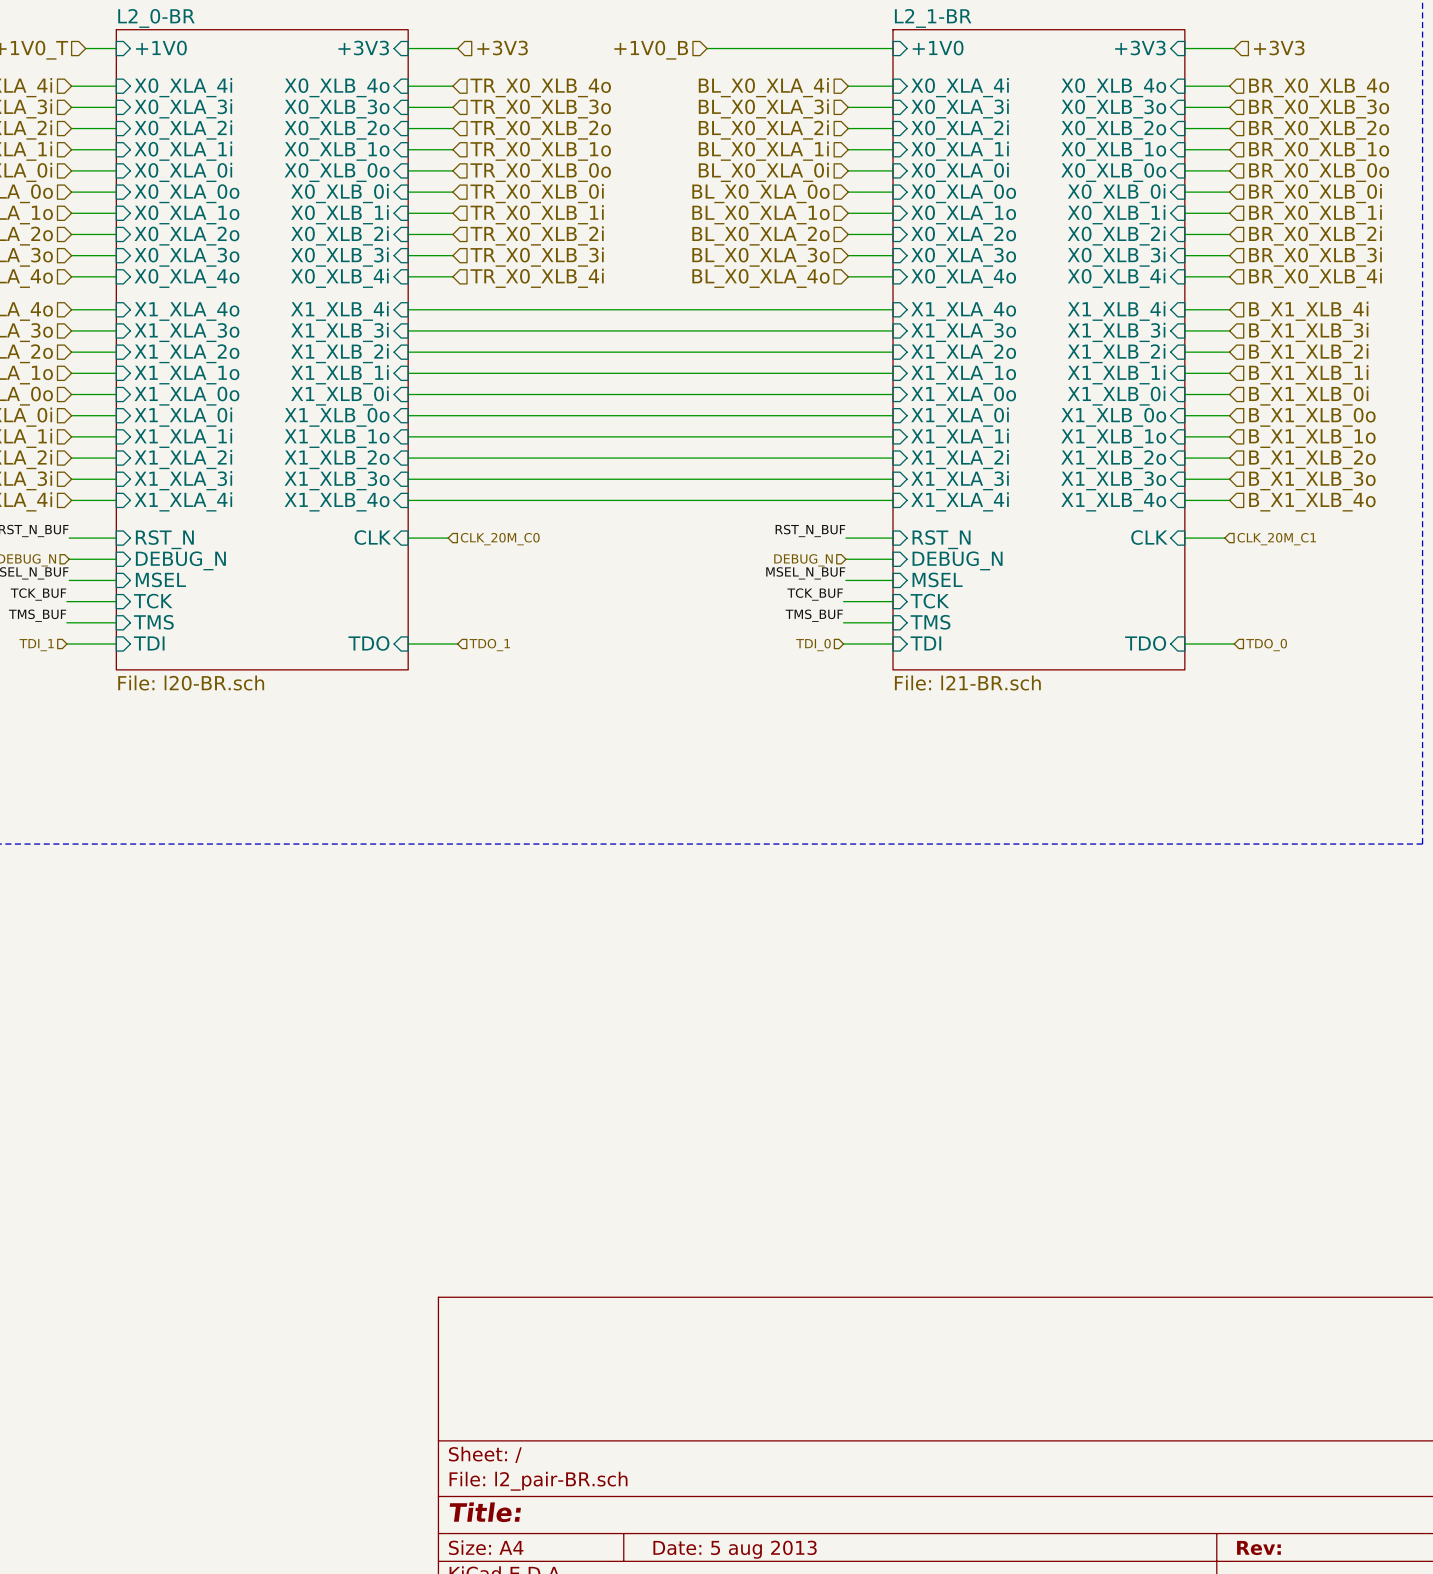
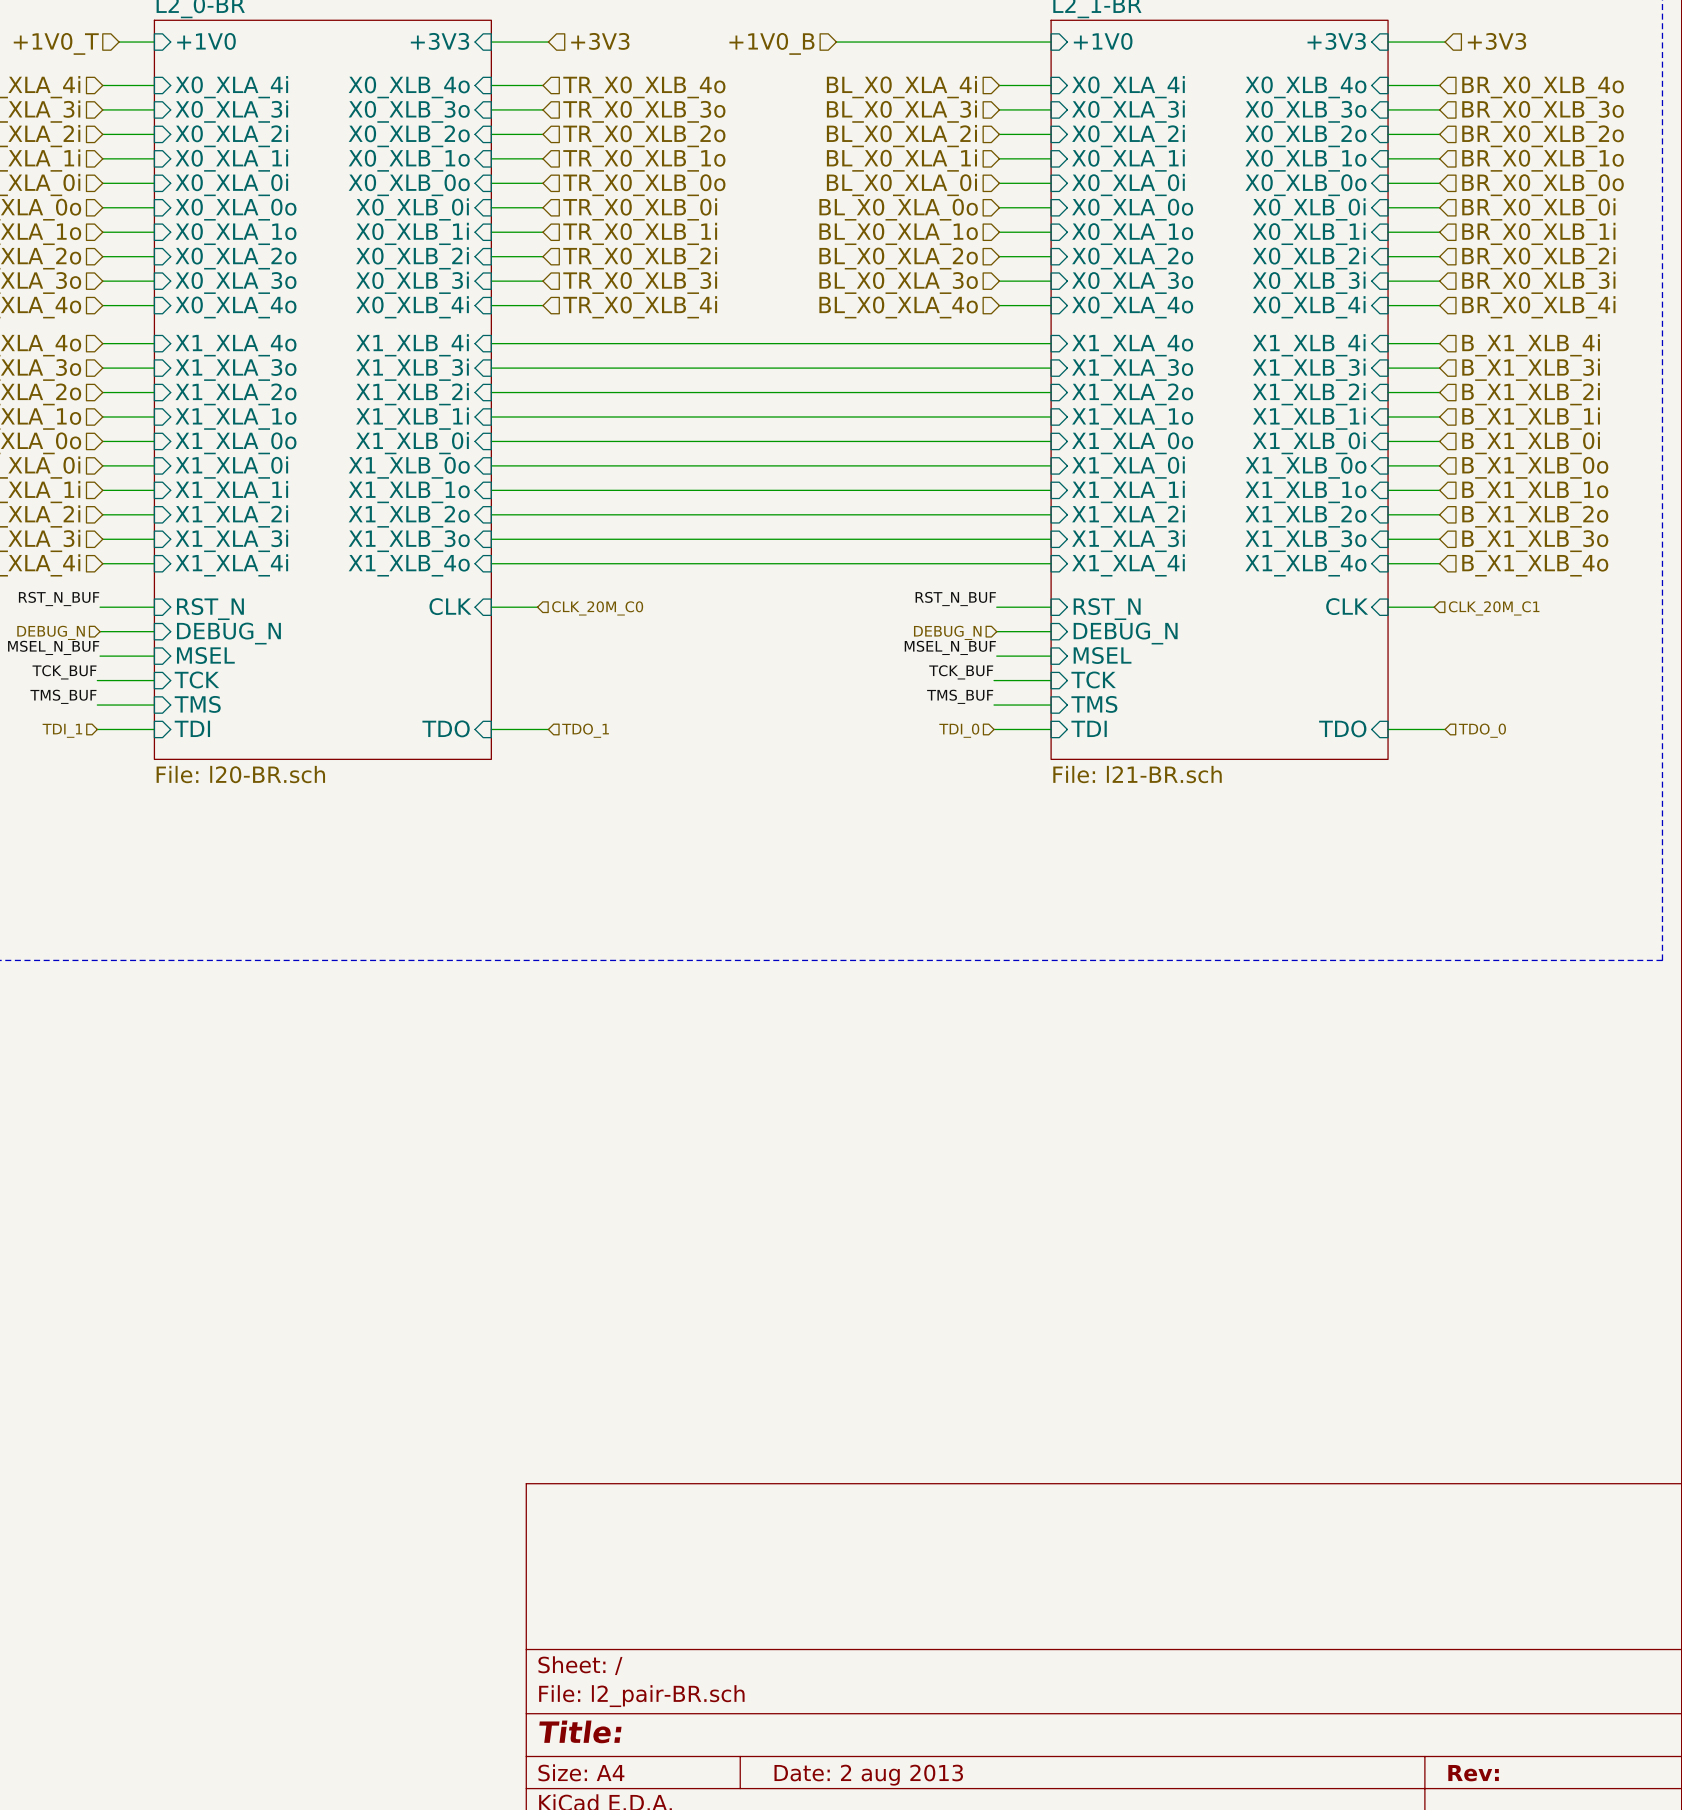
title block: Date: 5 aug 2013 (735, 1549) -> Date: 2 aug 2013 (868, 1775)

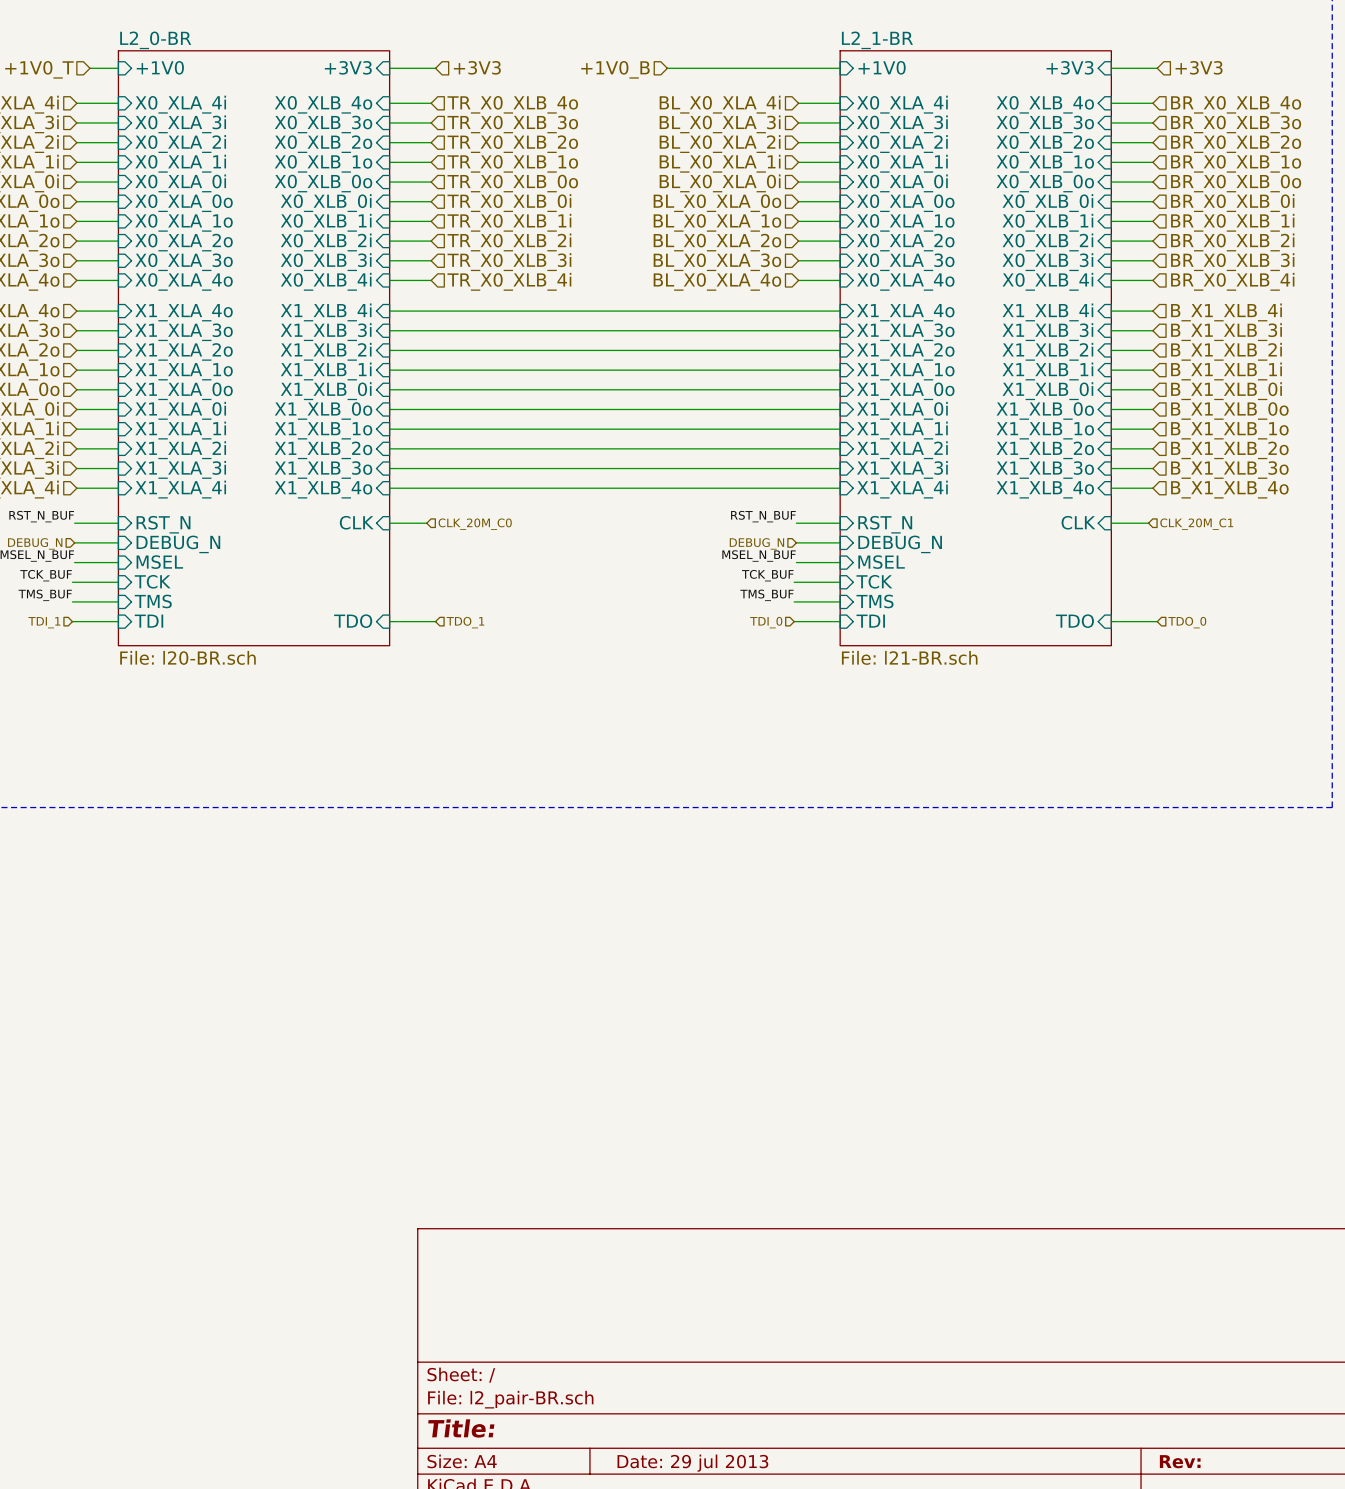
title block: Date: 2 aug 2013 (868, 1775) -> Date: 29 jul 2013 (692, 1463)

